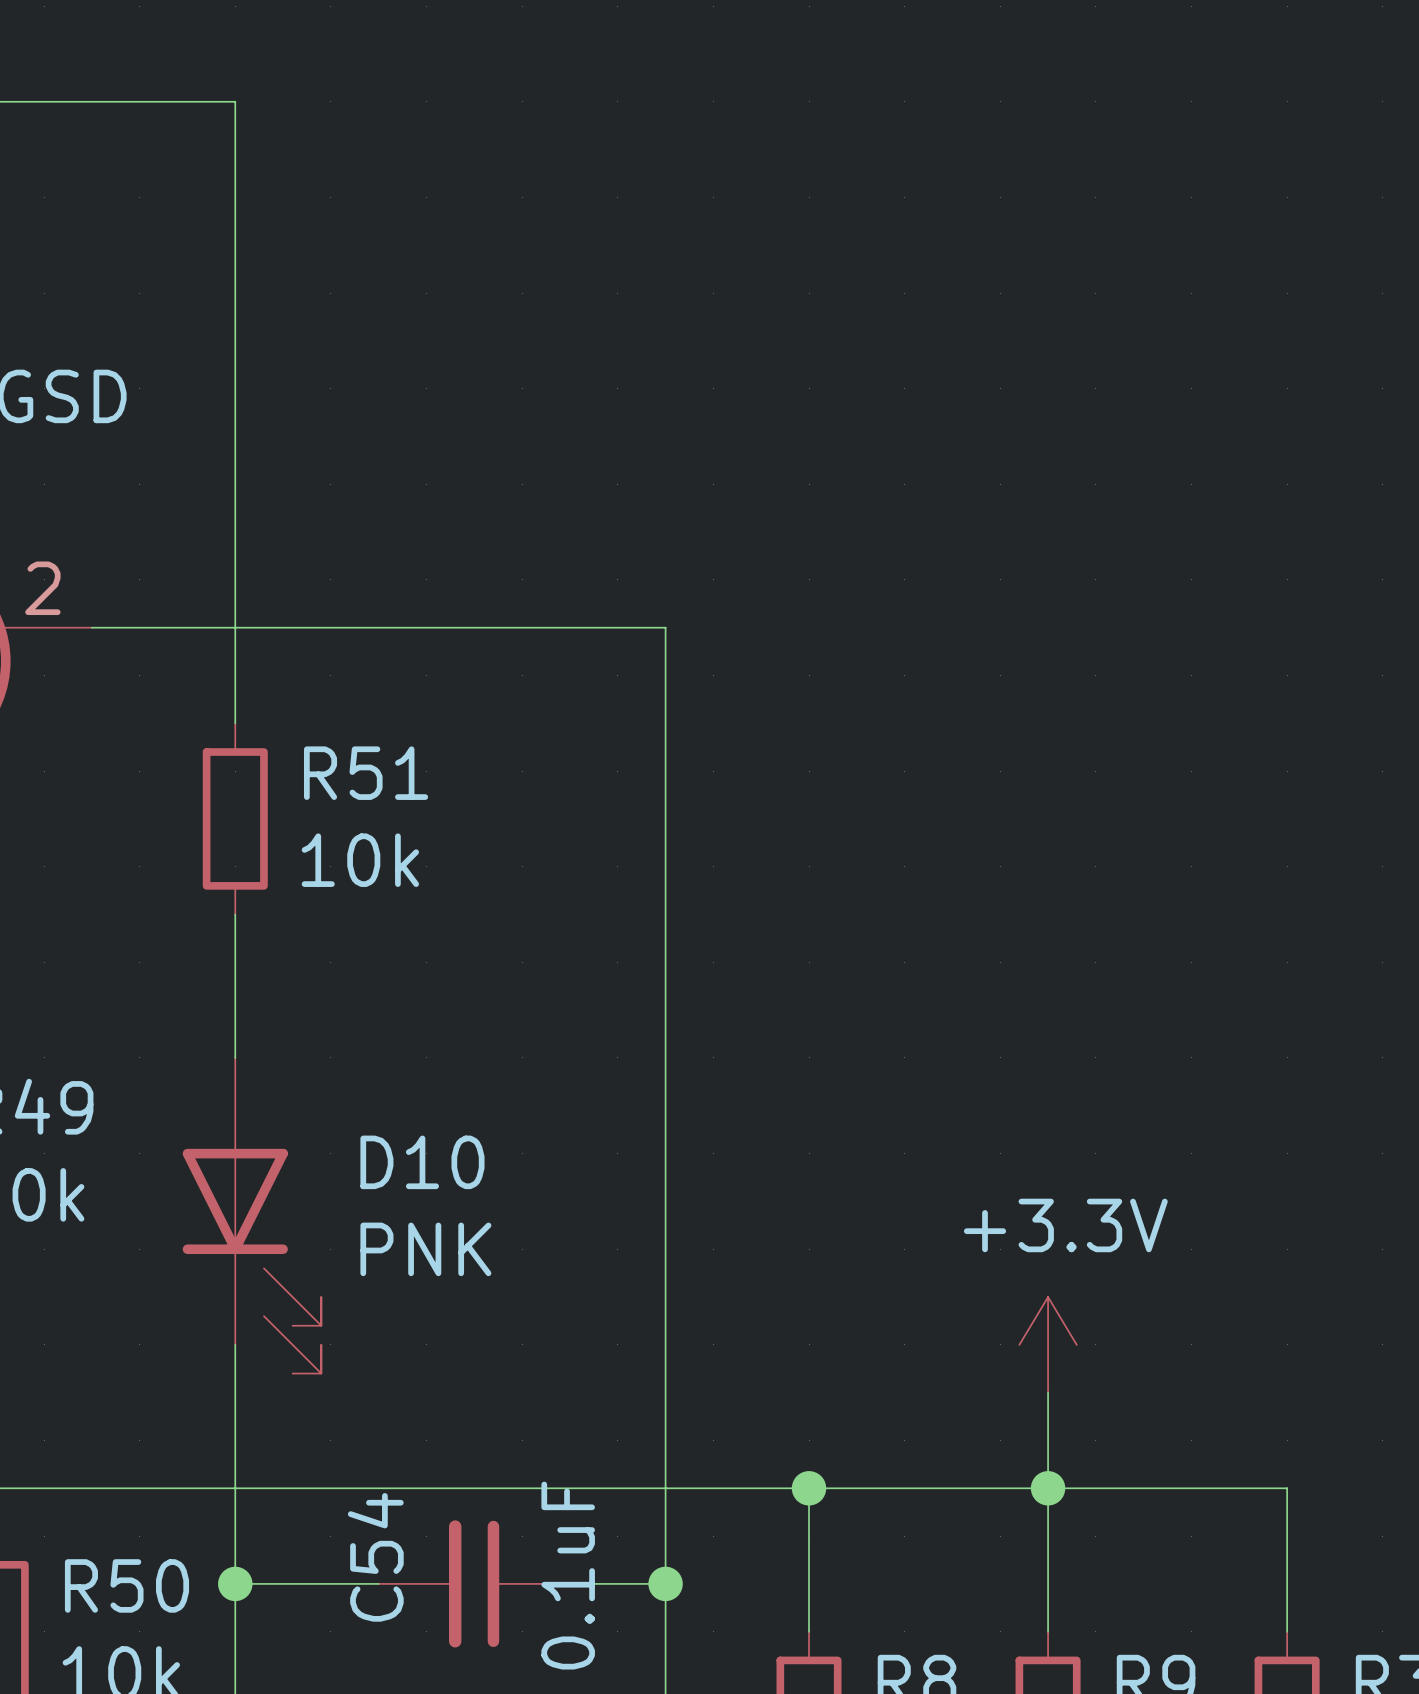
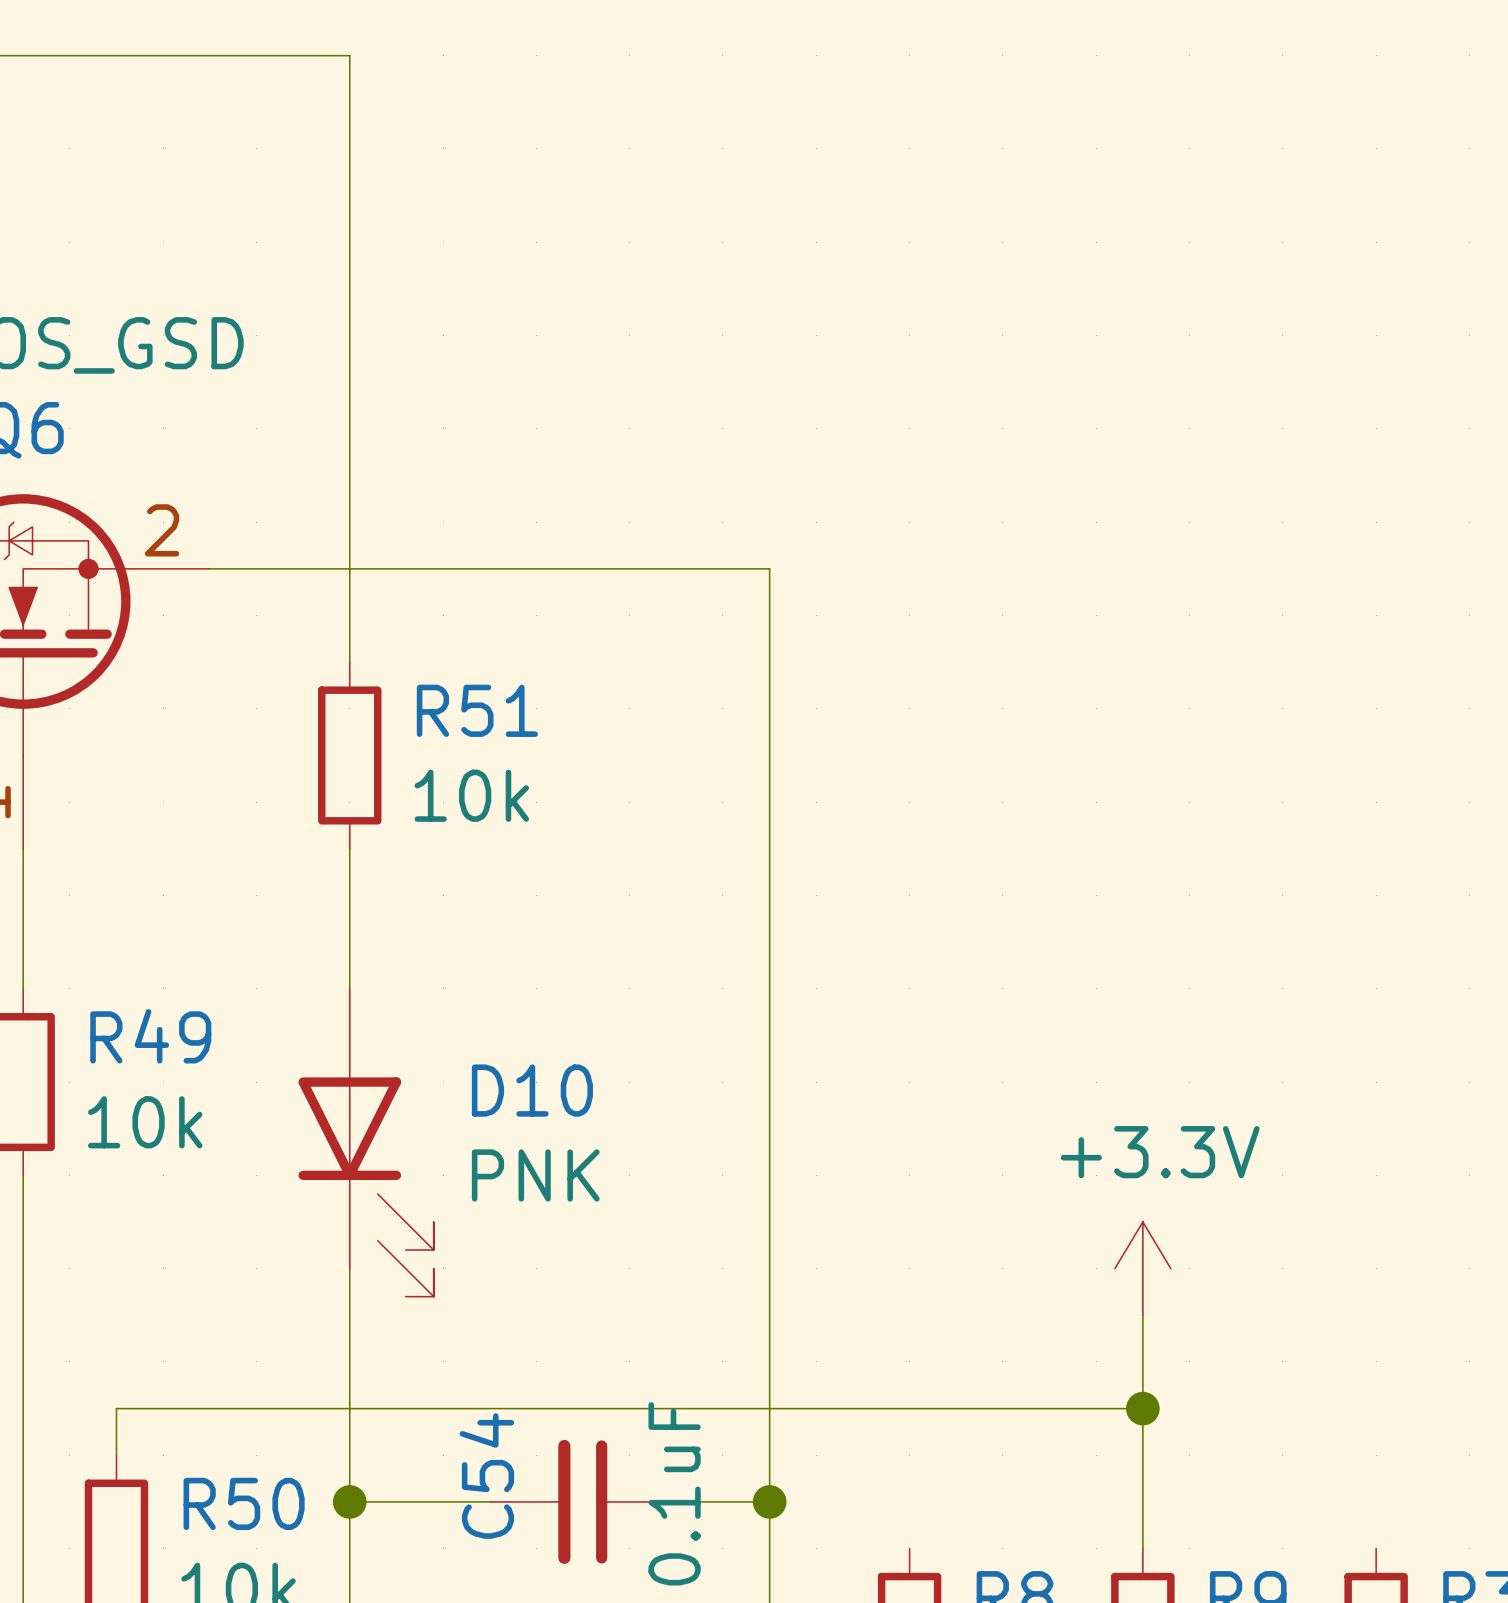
wire: (809, 1488) (809, 1631) -> none
junction: (809, 1488) -> none
wire: (1048, 1488) (1287, 1488) (1287, 1631) -> none

